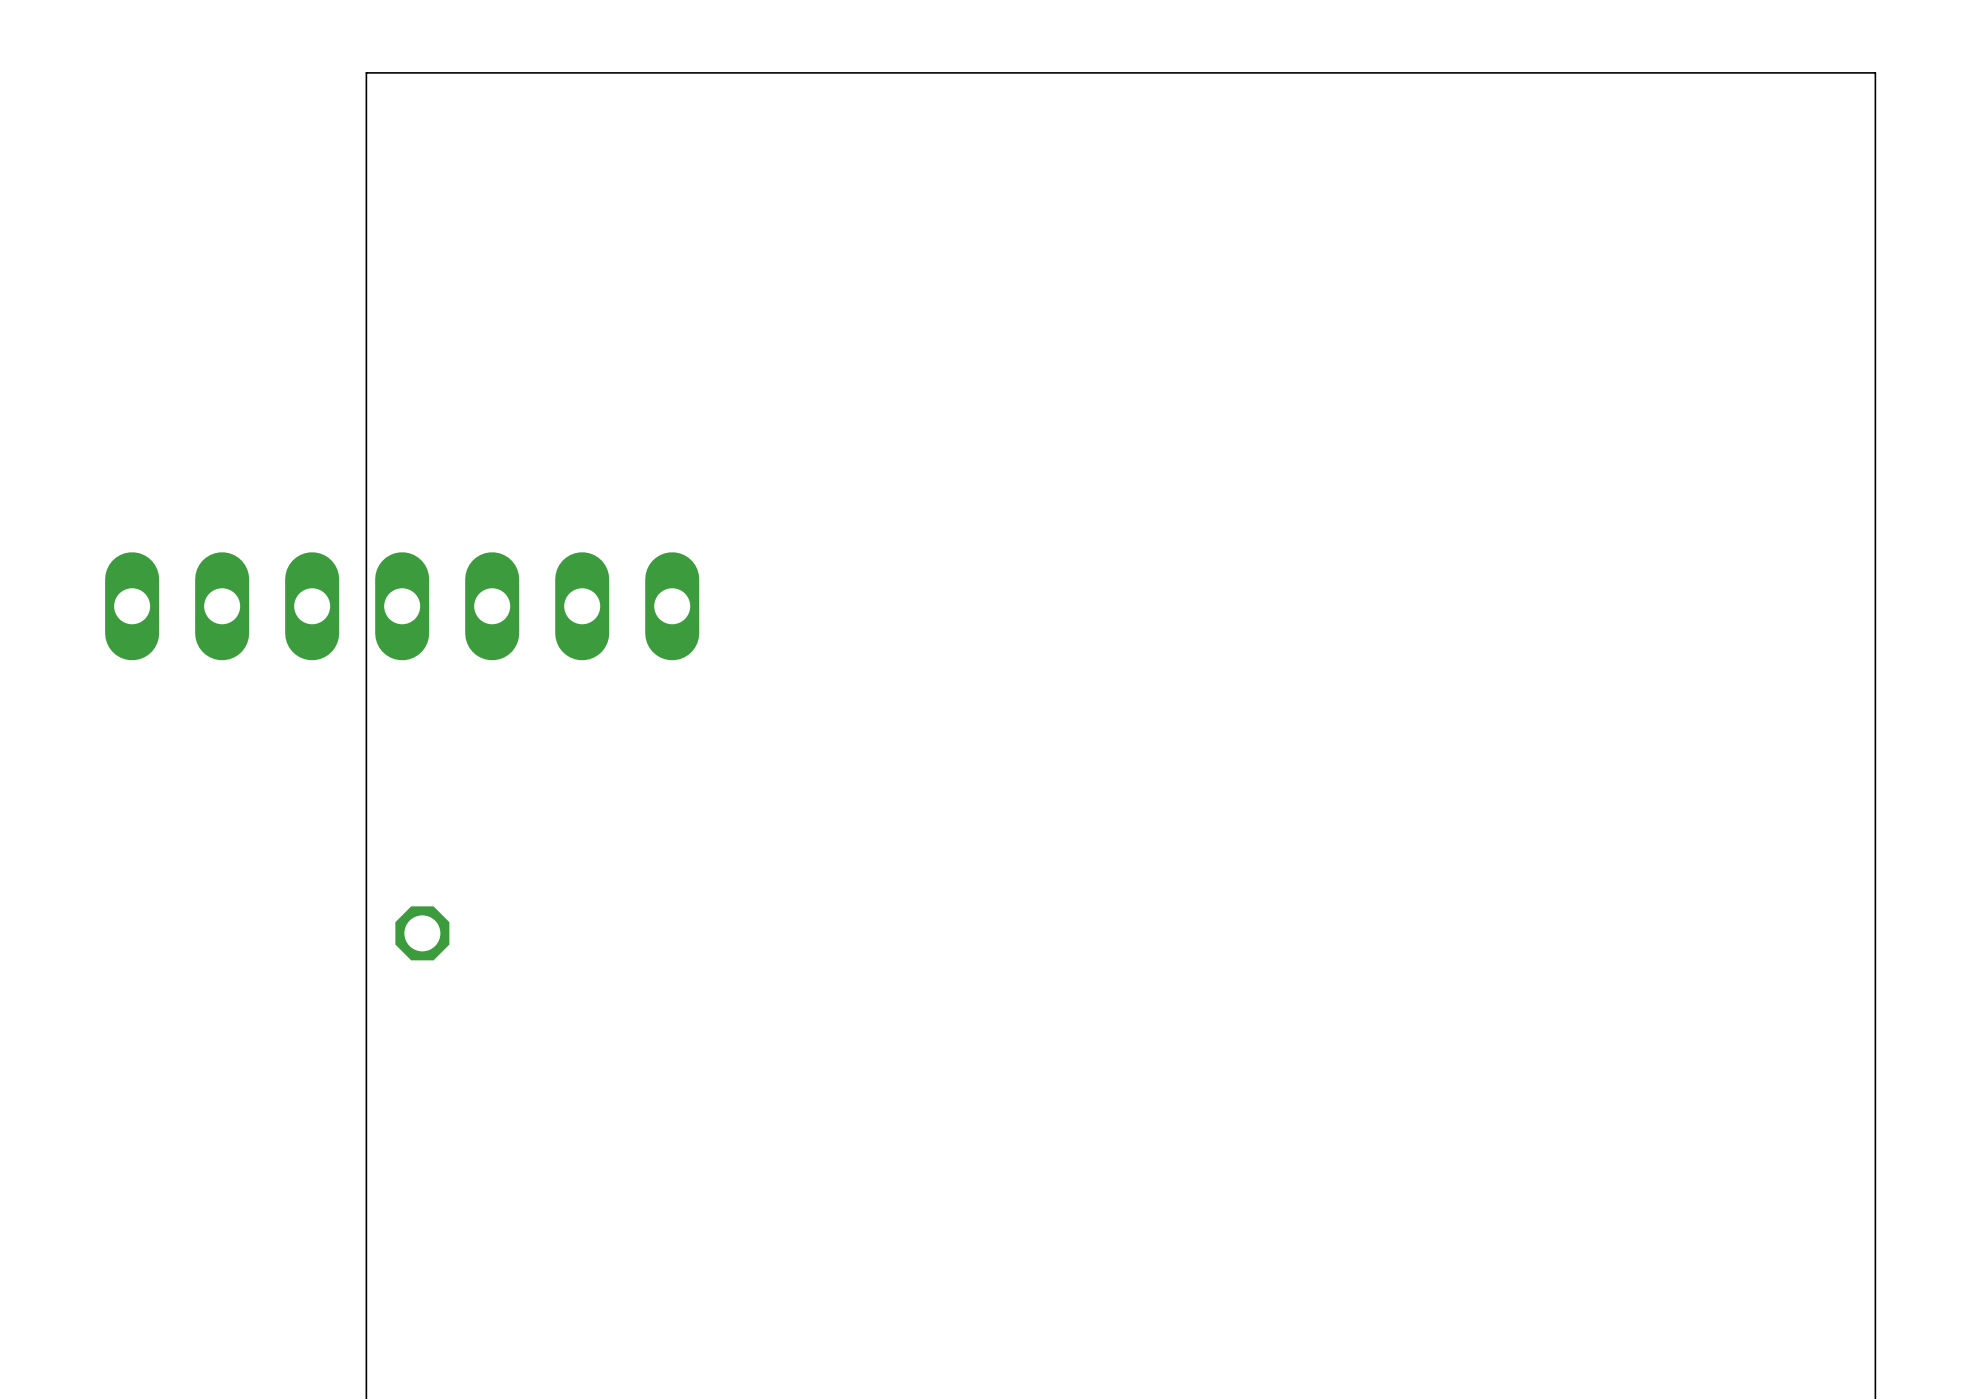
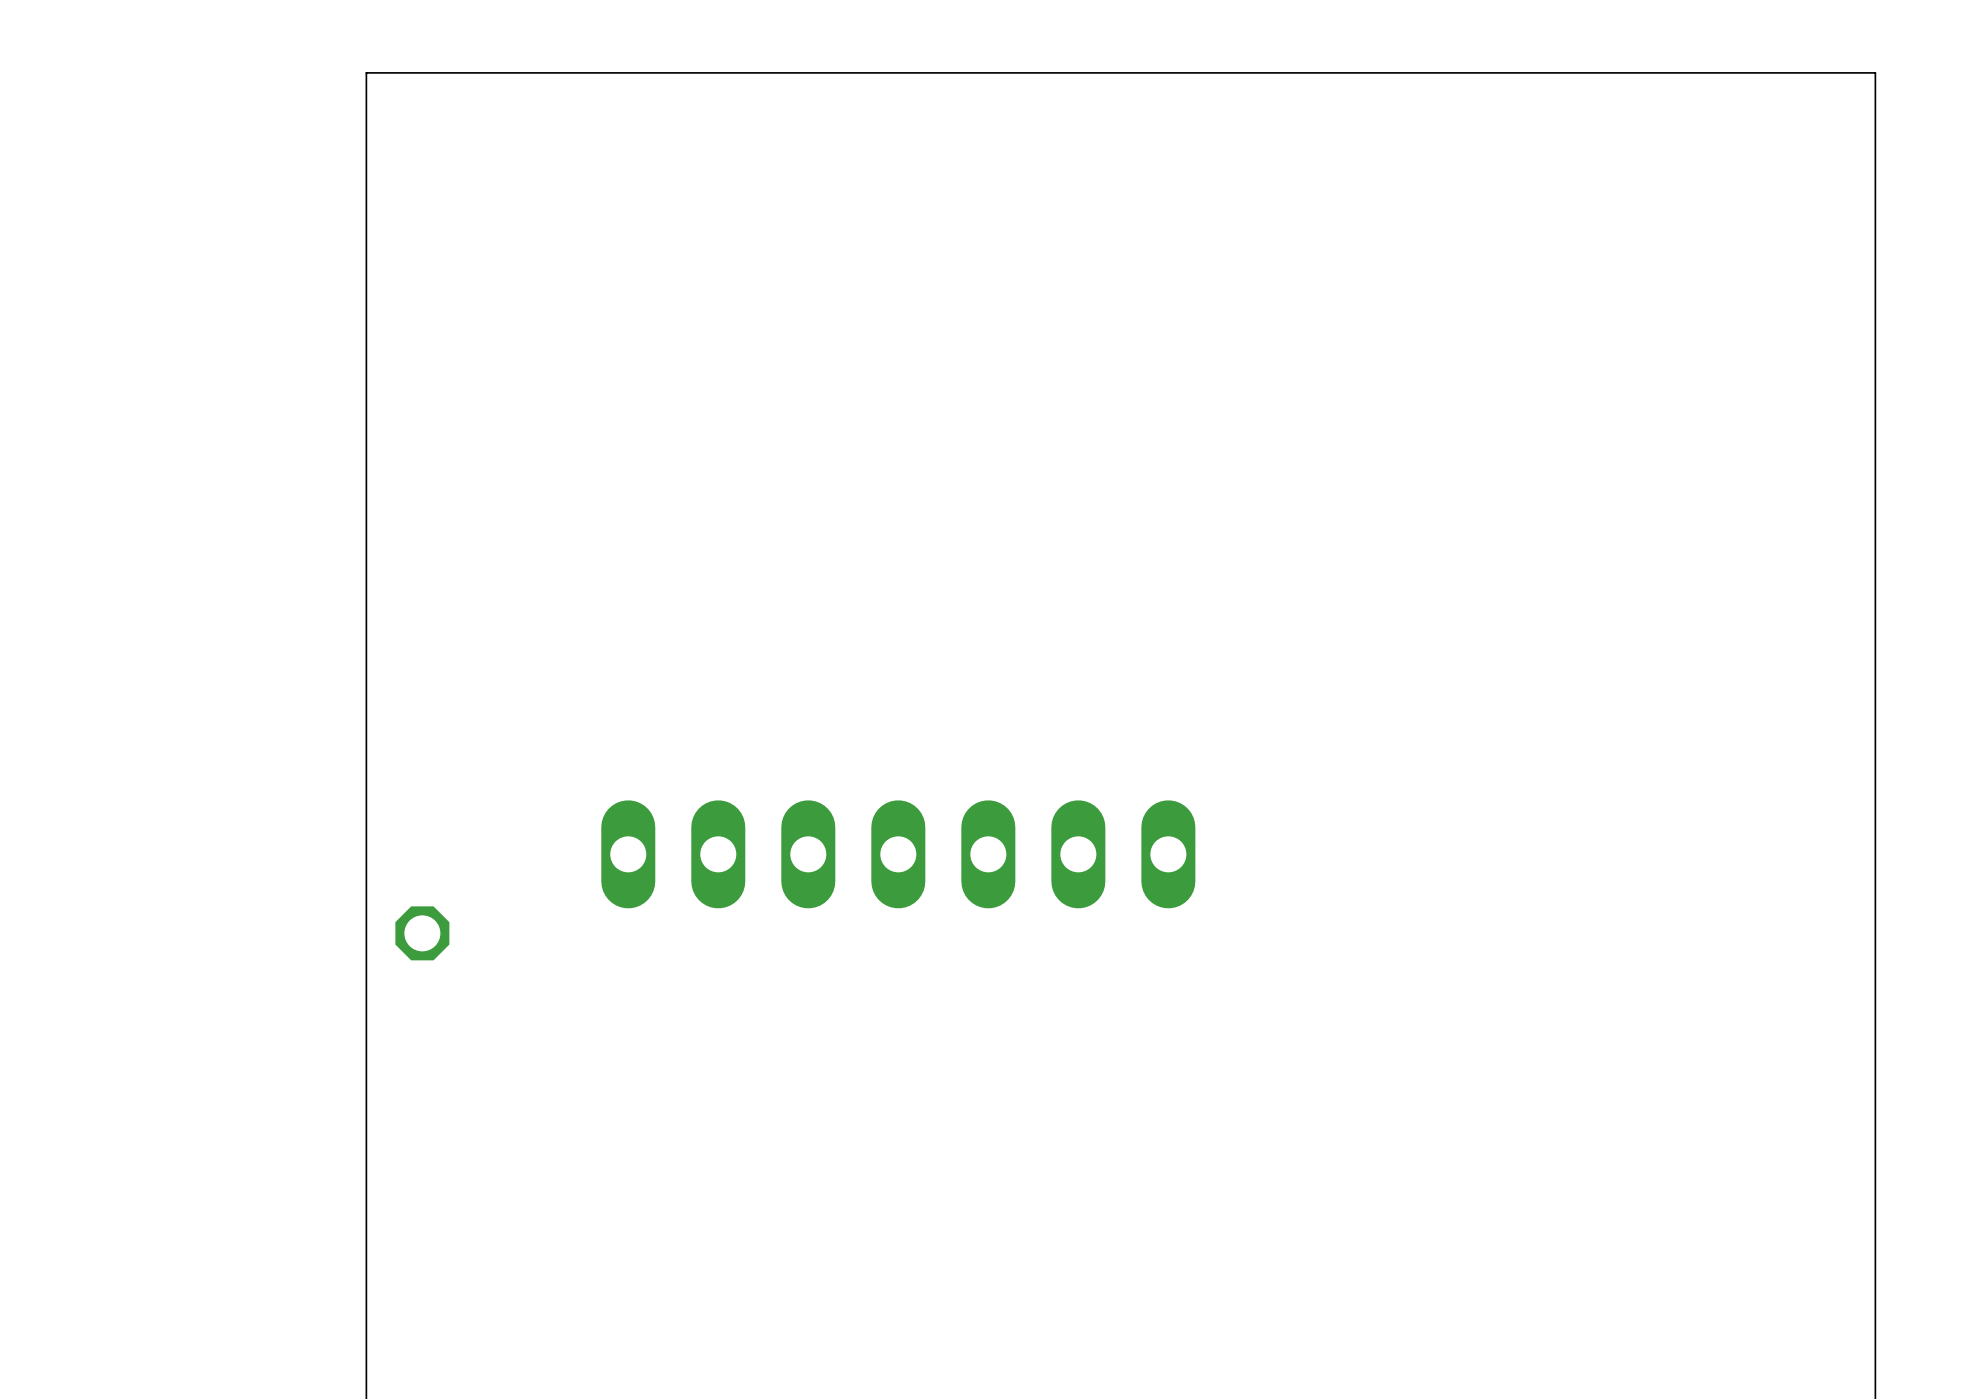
part position: (402, 606) -> (898, 854)

